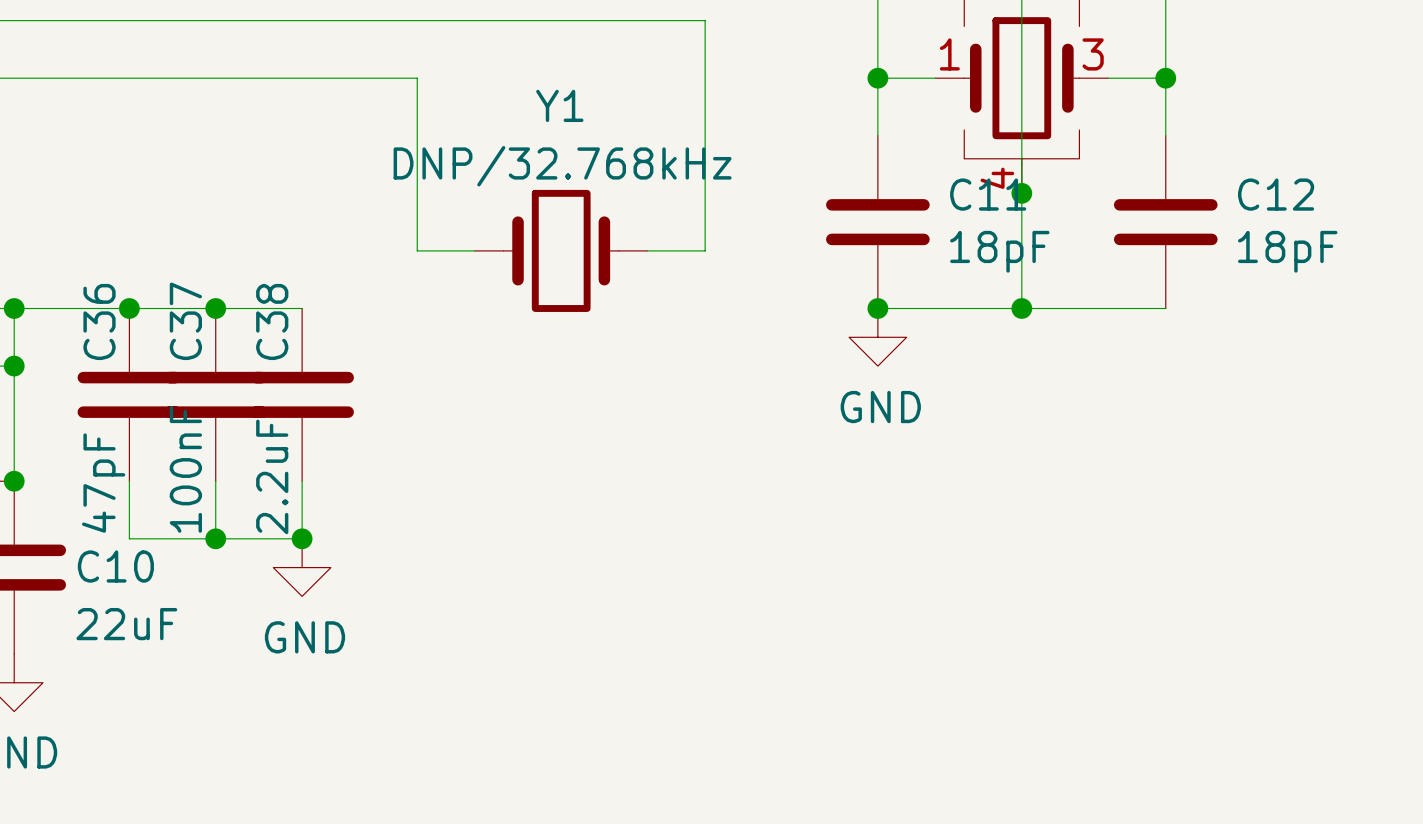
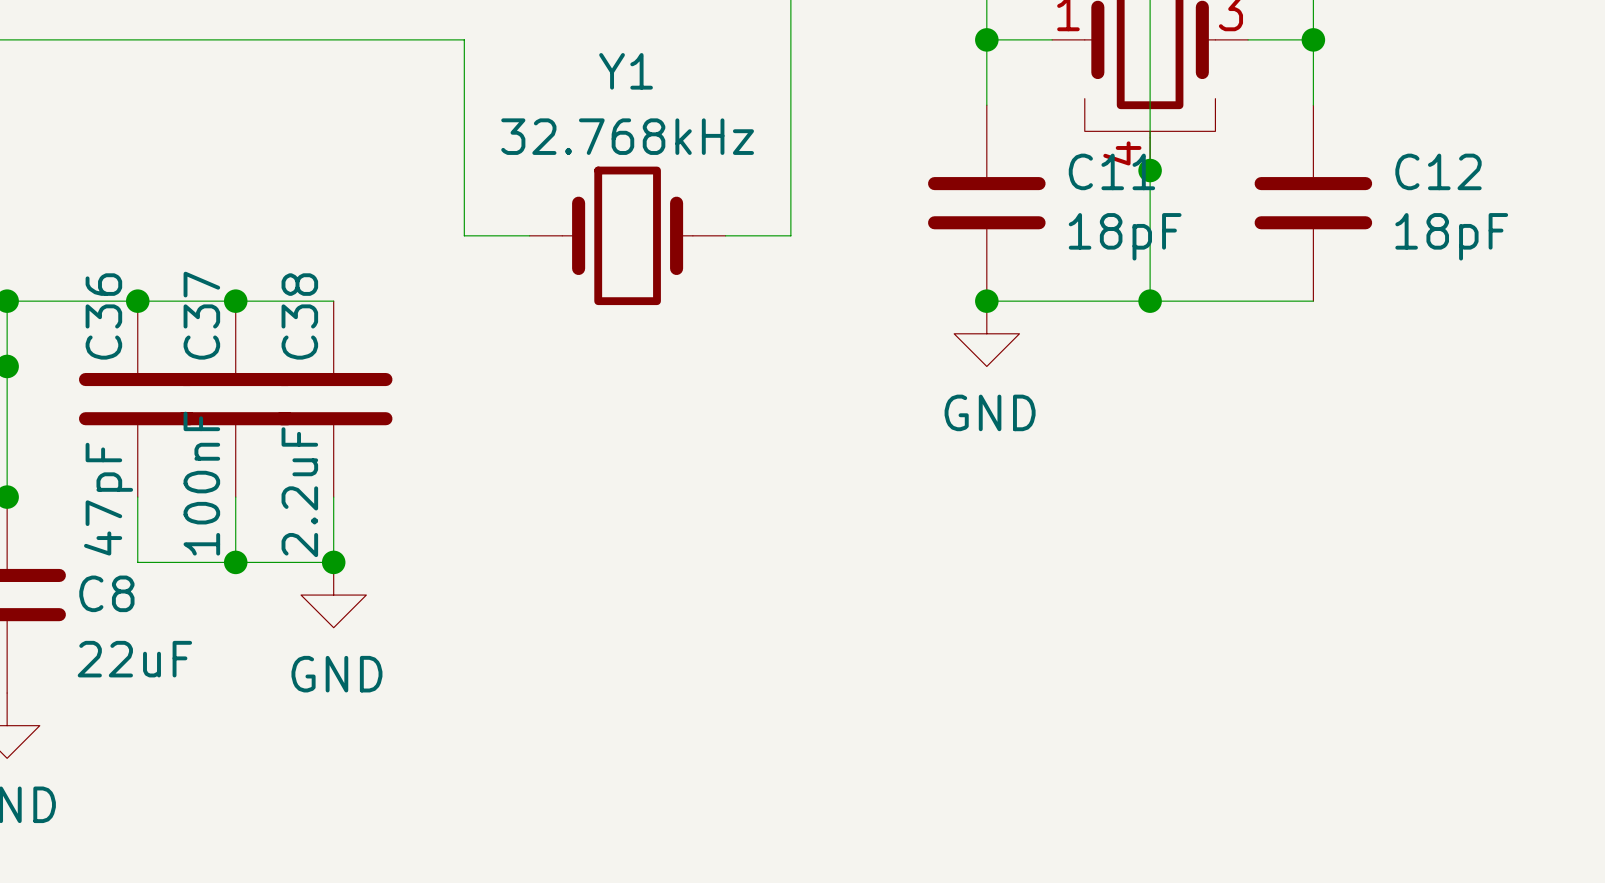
Y1 value: DNP/32.768kHz (562, 166) -> 32.768kHz (627, 136)
C10 name: C10 (115, 566) -> C8 (106, 593)

